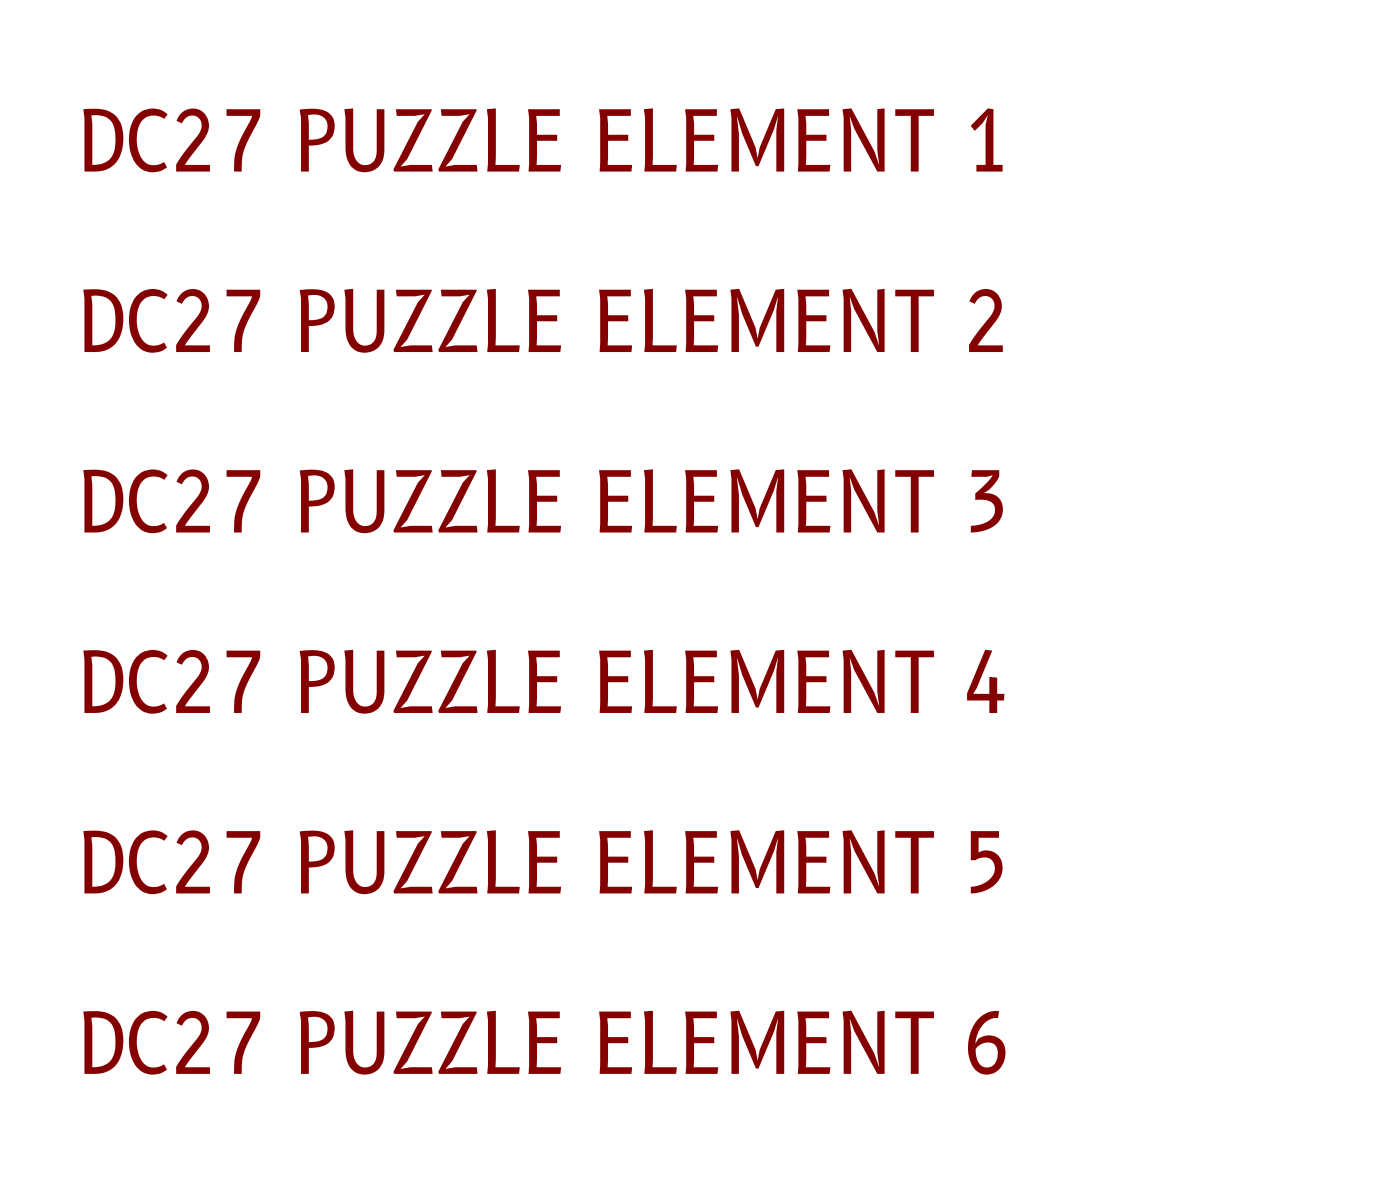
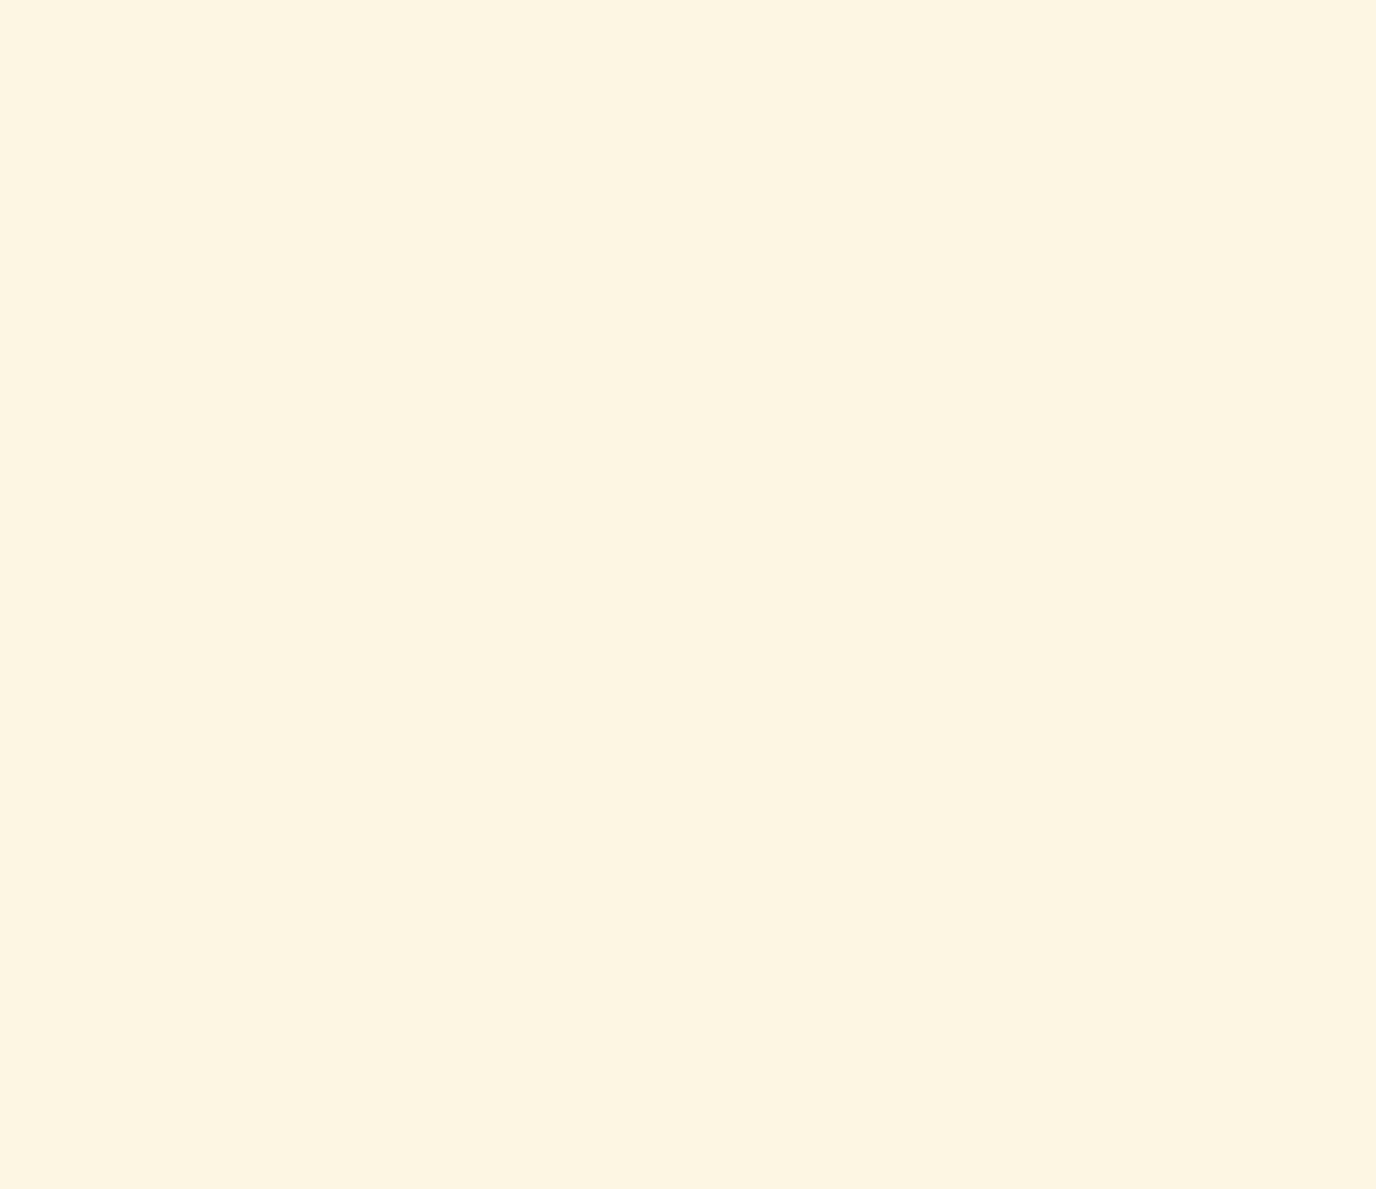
part: (542, 140) -> none
part: (543, 320) -> none
part: (543, 501) -> none
part: (543, 681) -> none
part: (542, 862) -> none
part: (544, 1042) -> none

